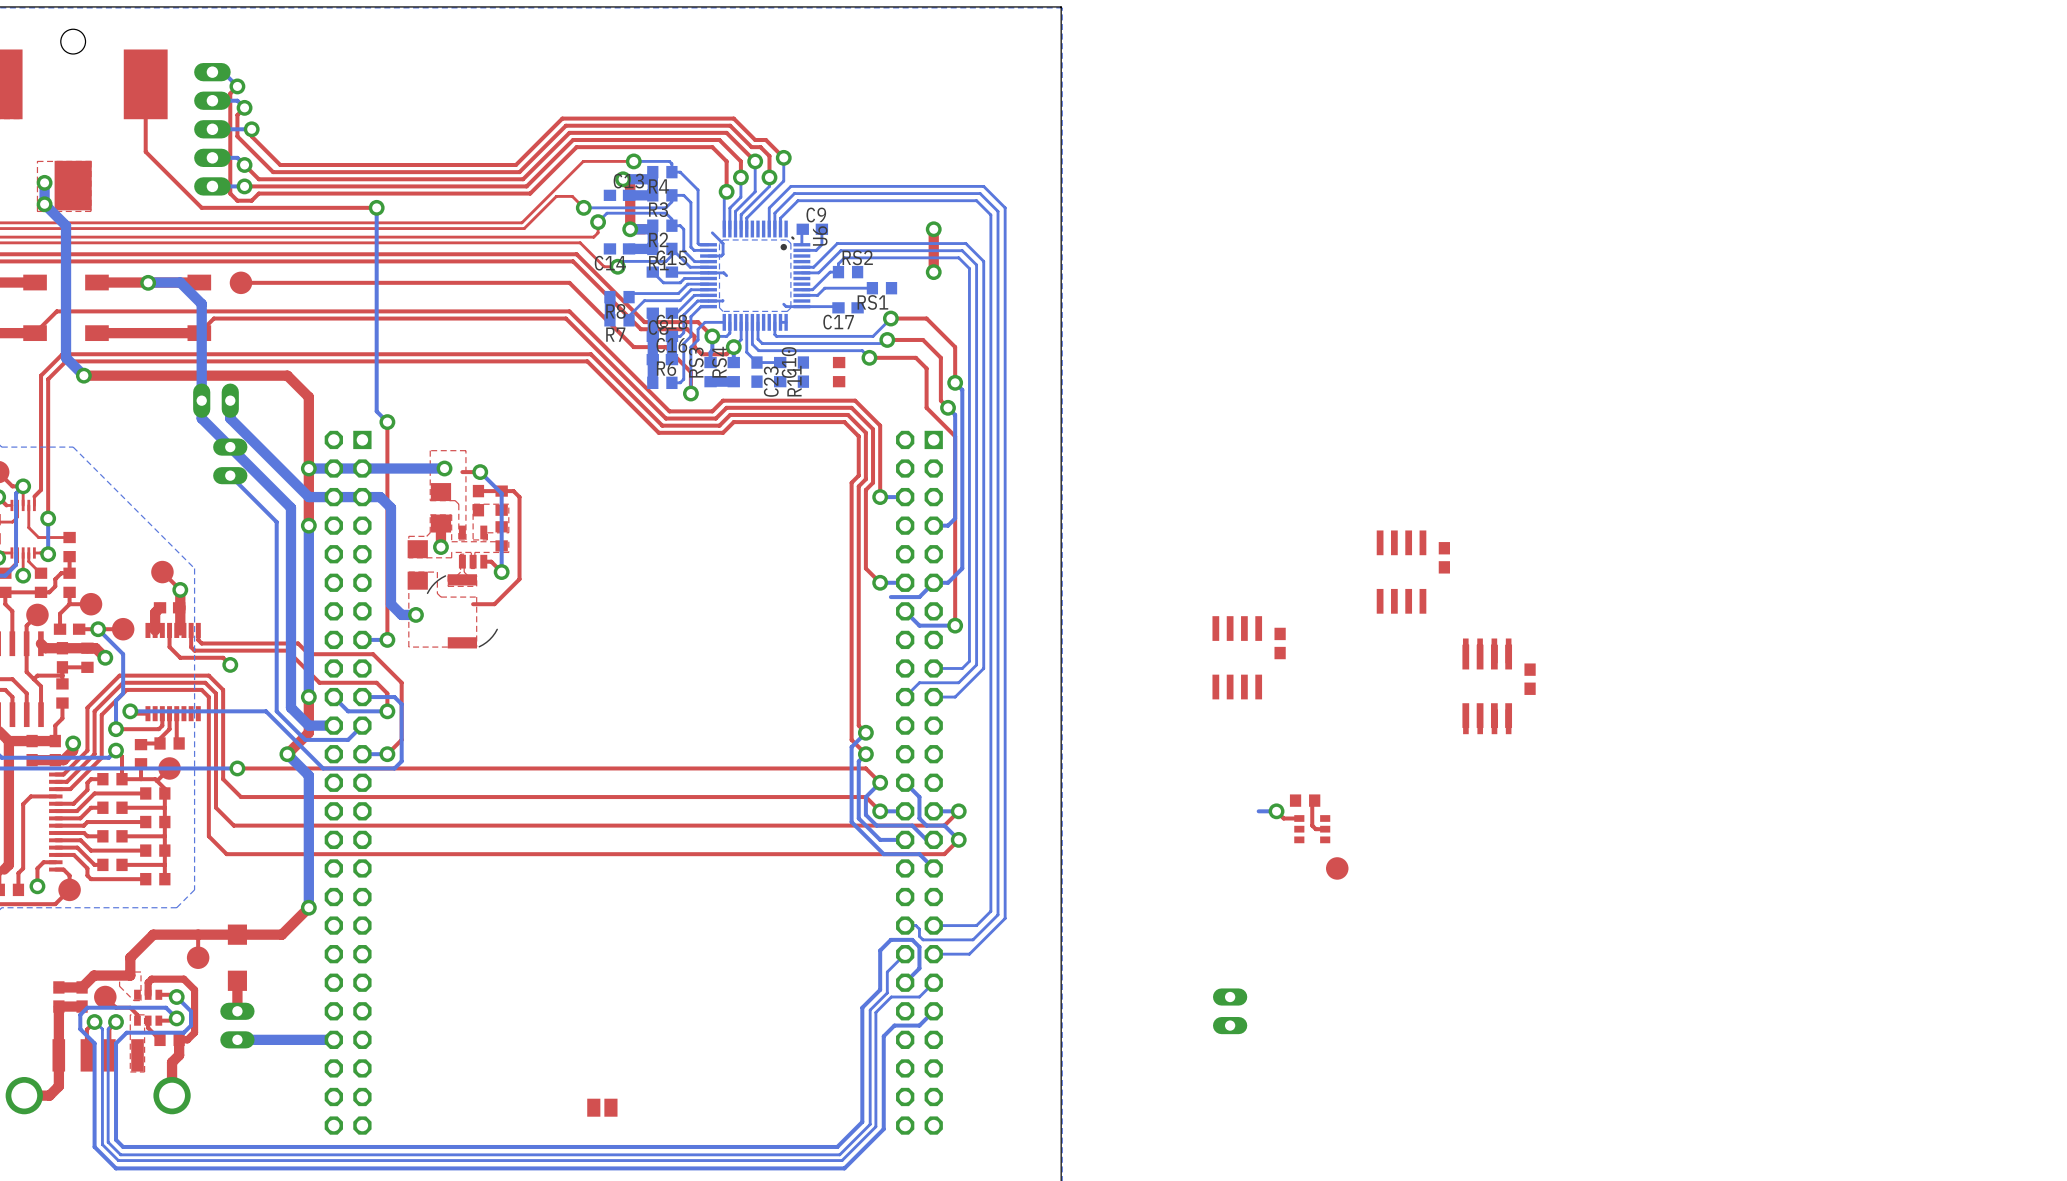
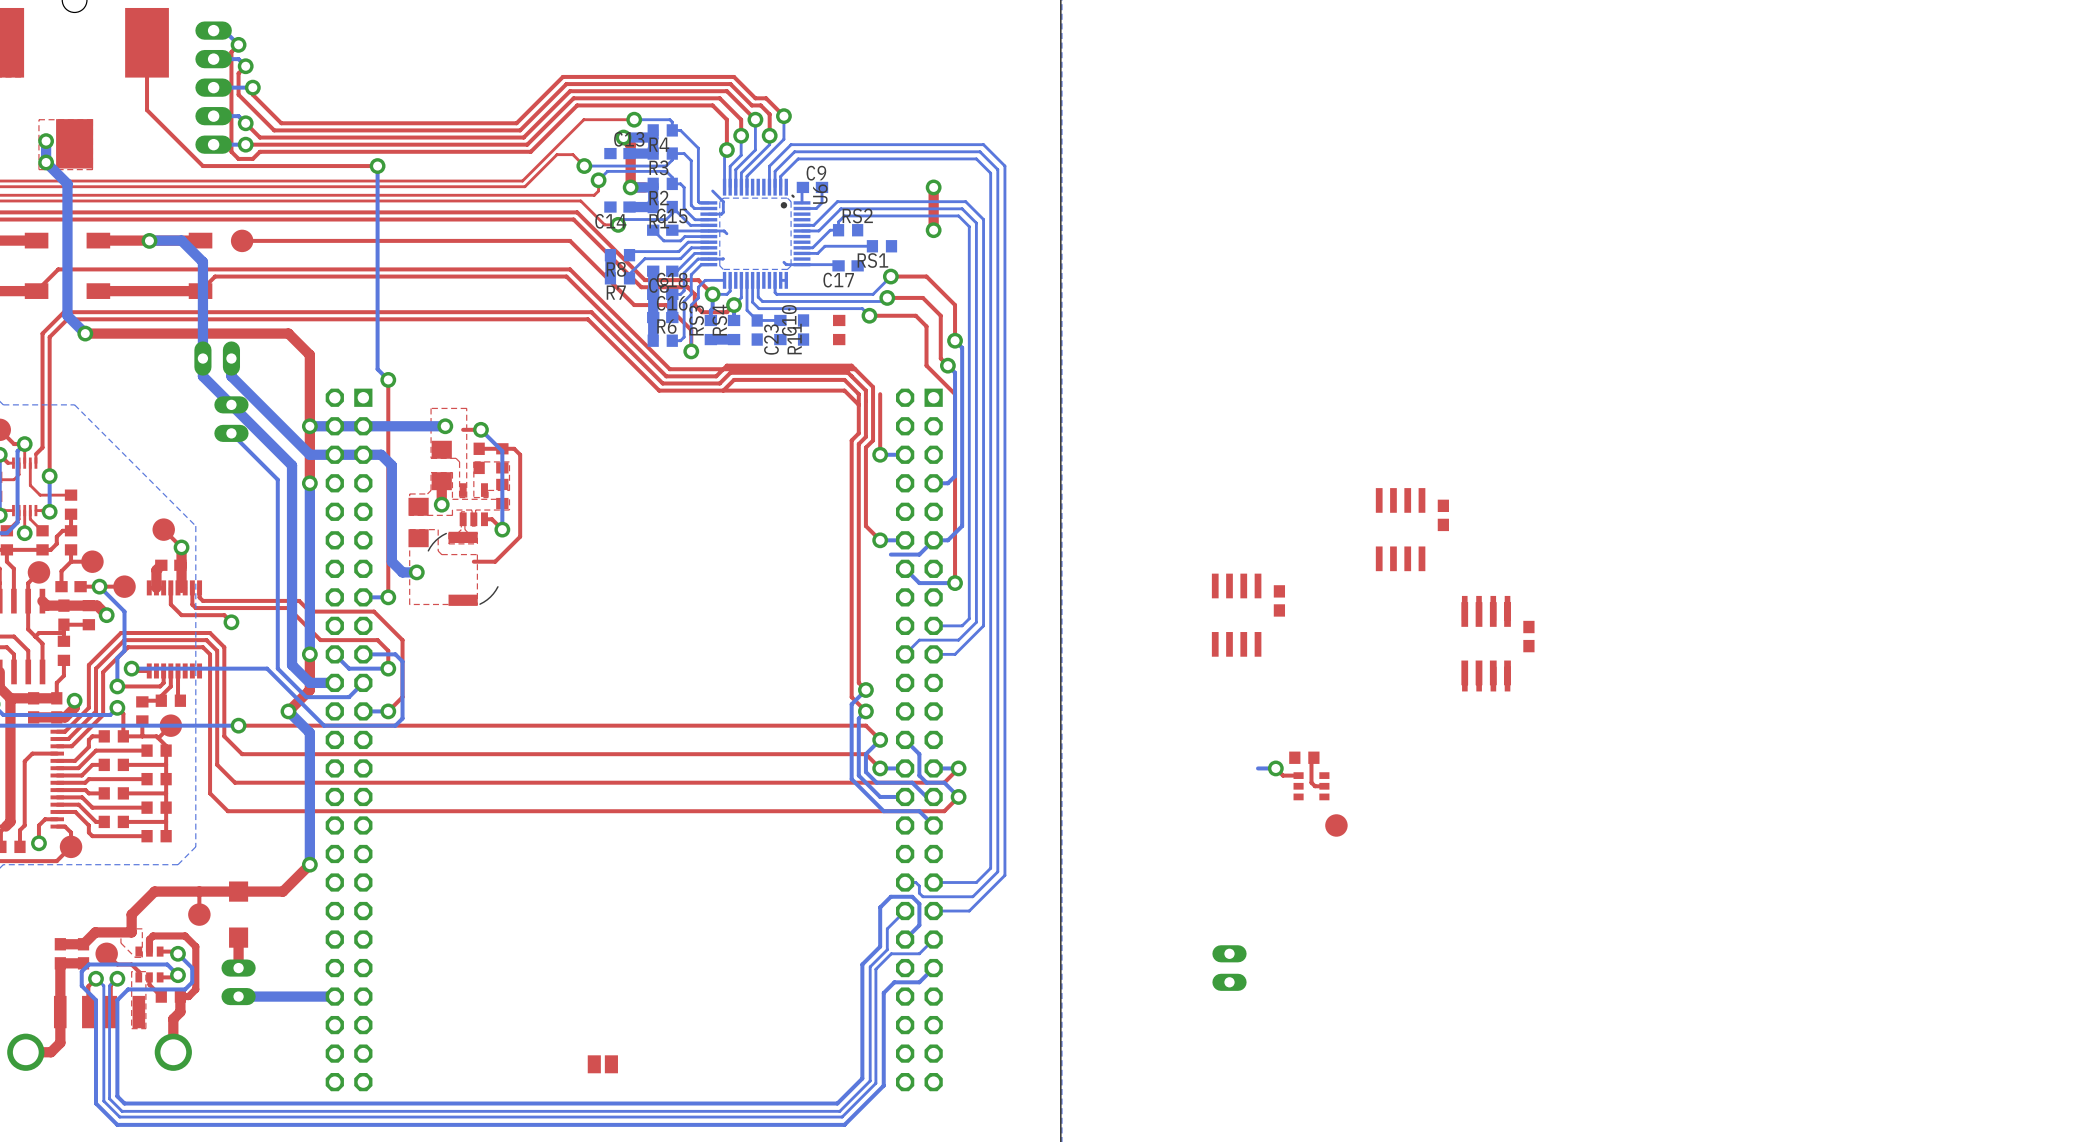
top track: (712, 411) (723, 400) (855, 400) (880, 425) (880, 436) -> (712, 369) (855, 369)
top track: none -> (723, 390) (844, 390) (858, 404)

